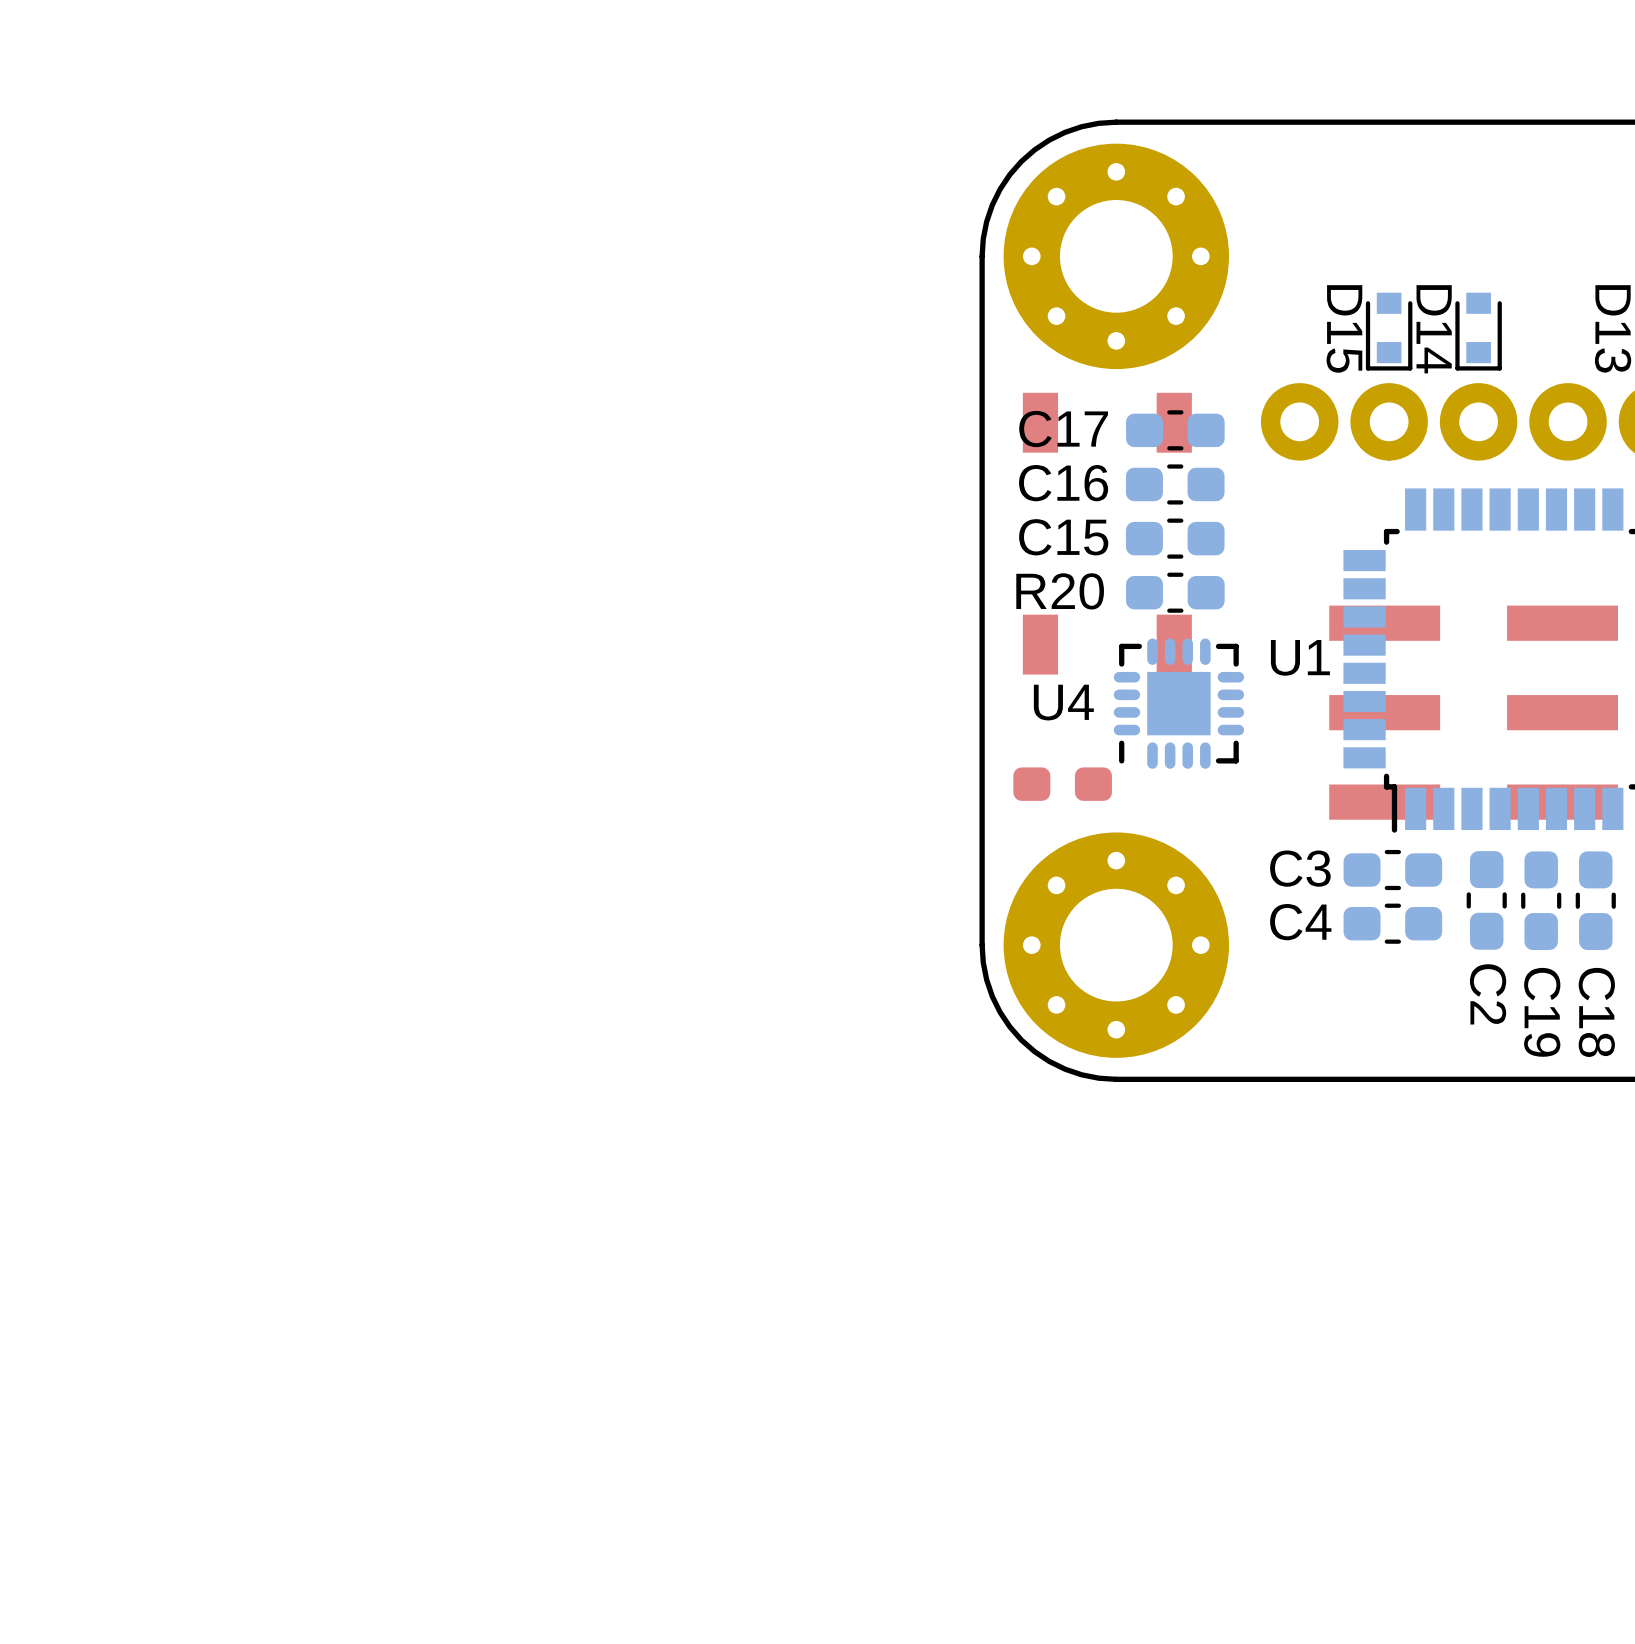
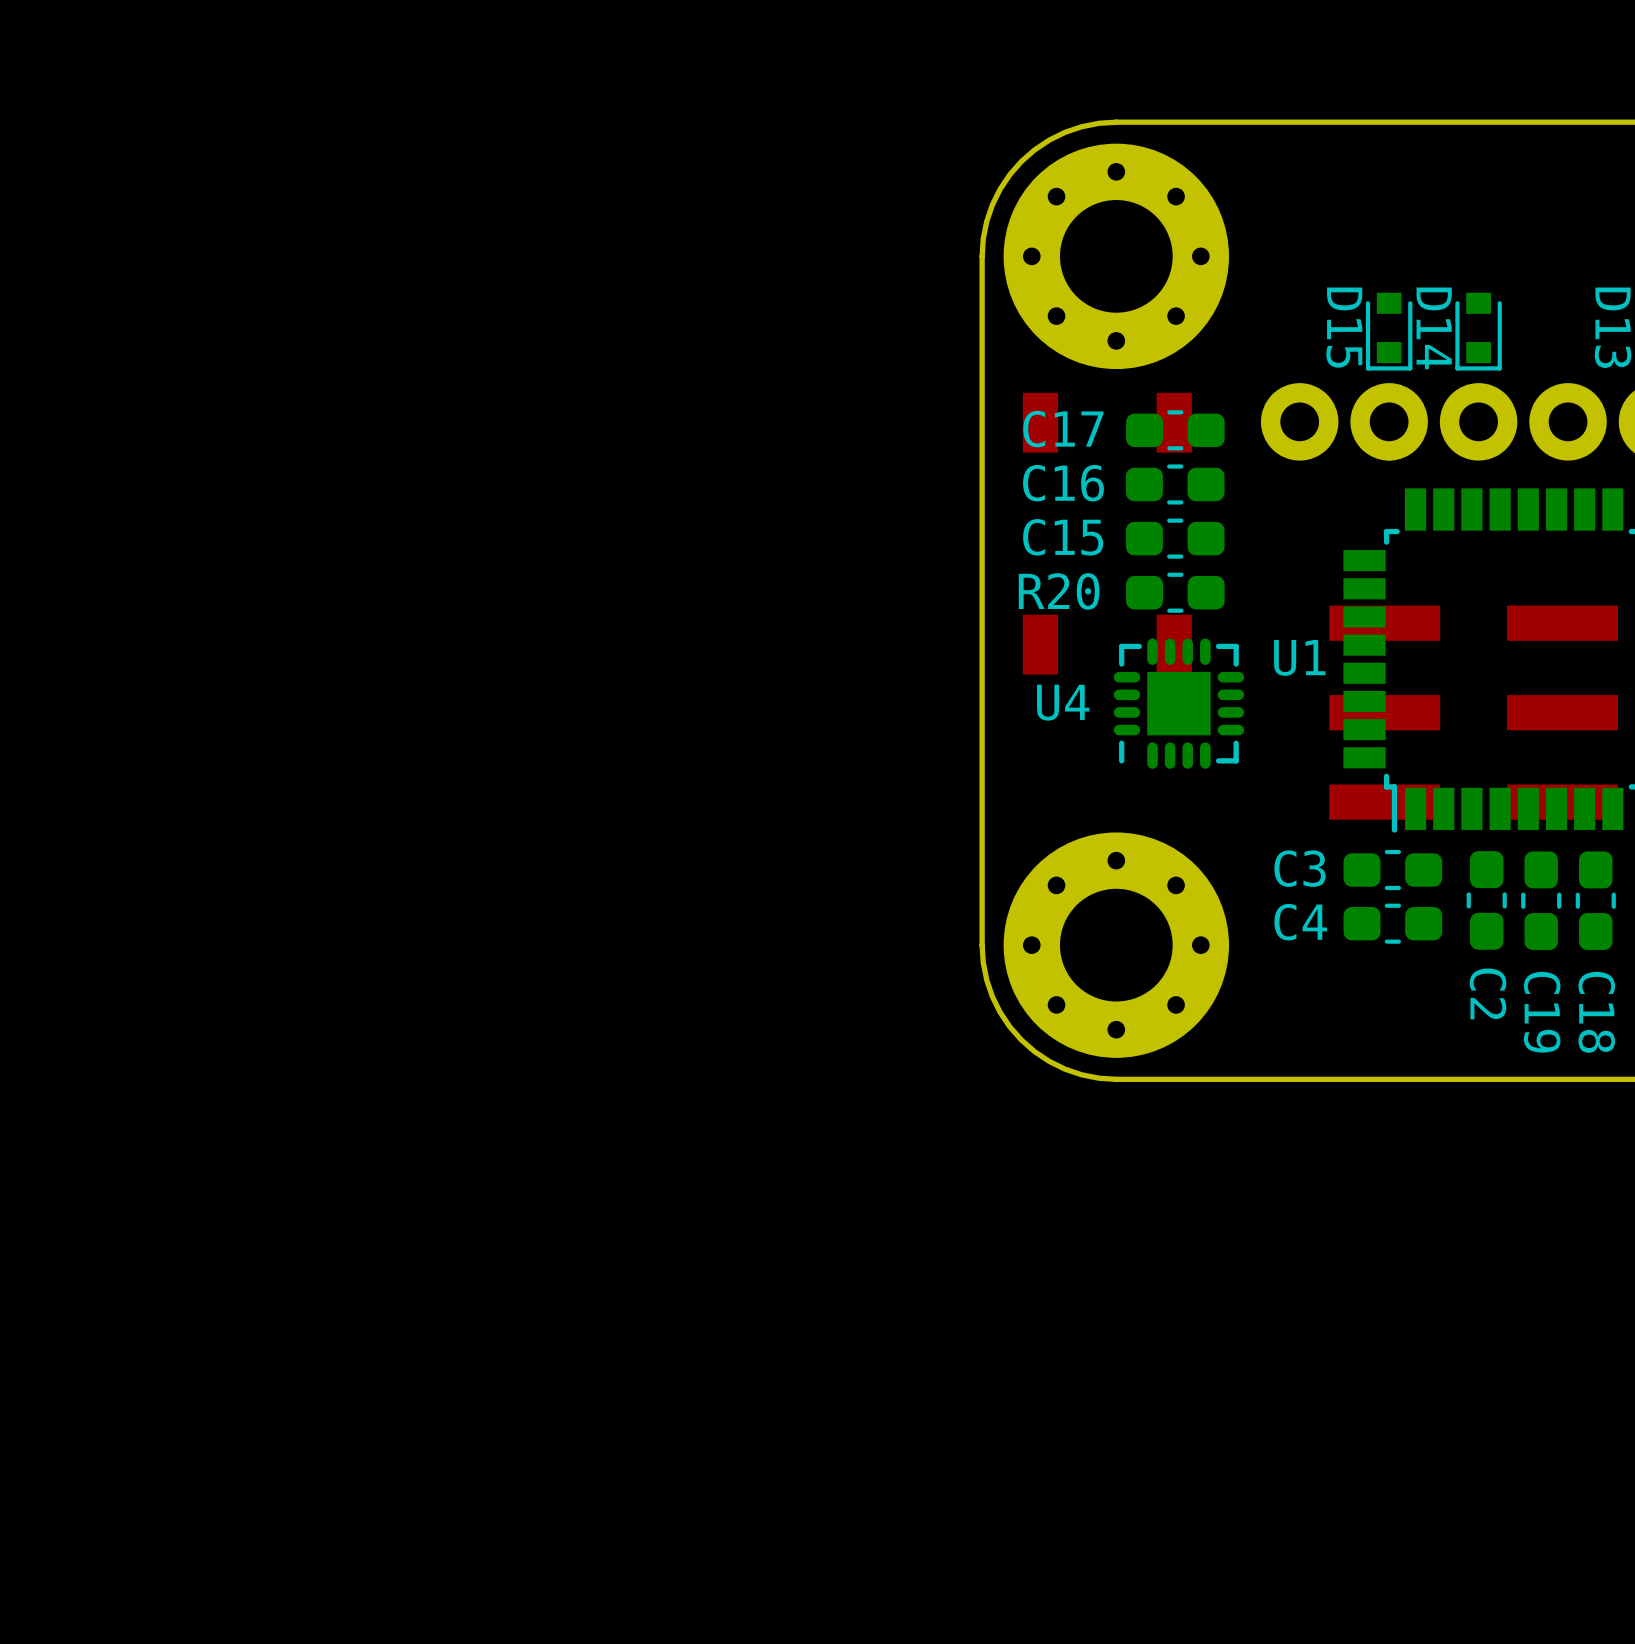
part: (1062, 784) -> none

